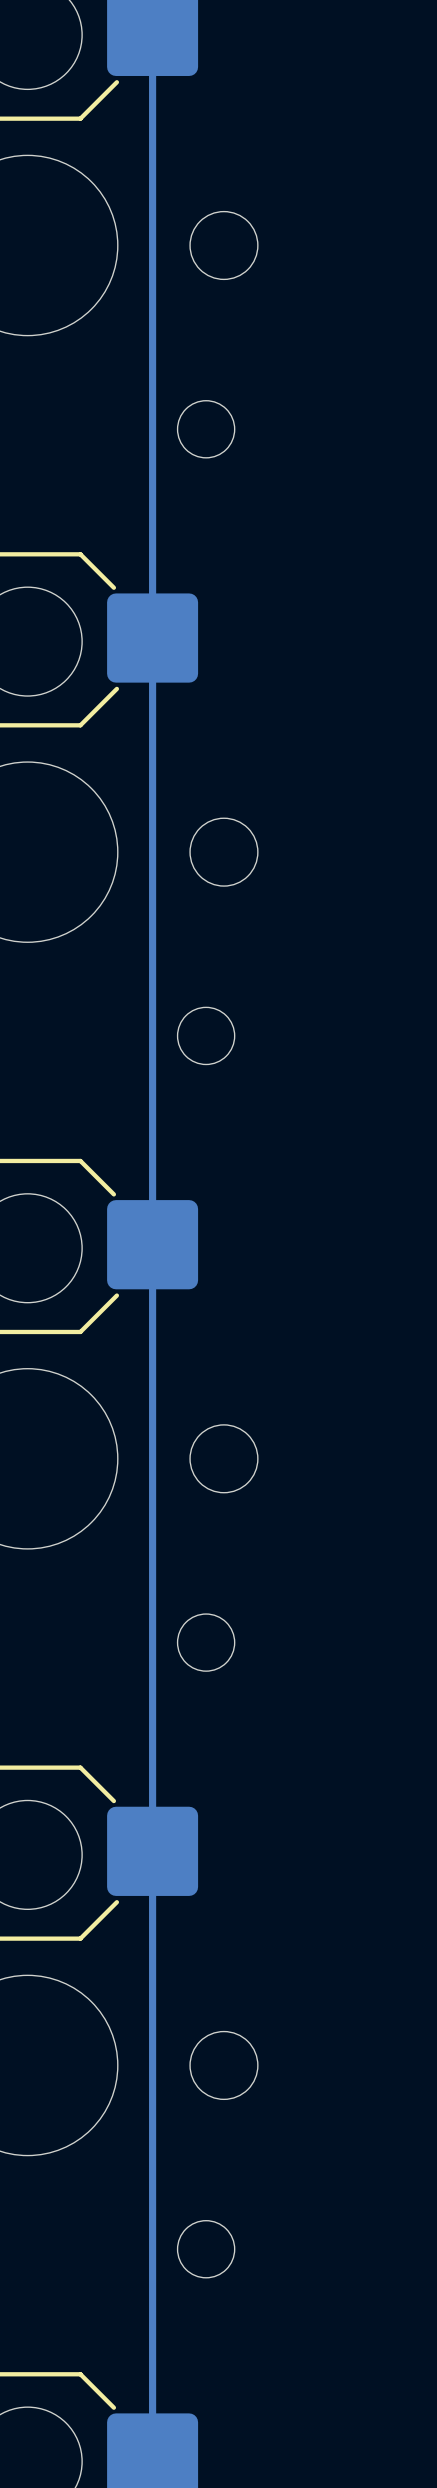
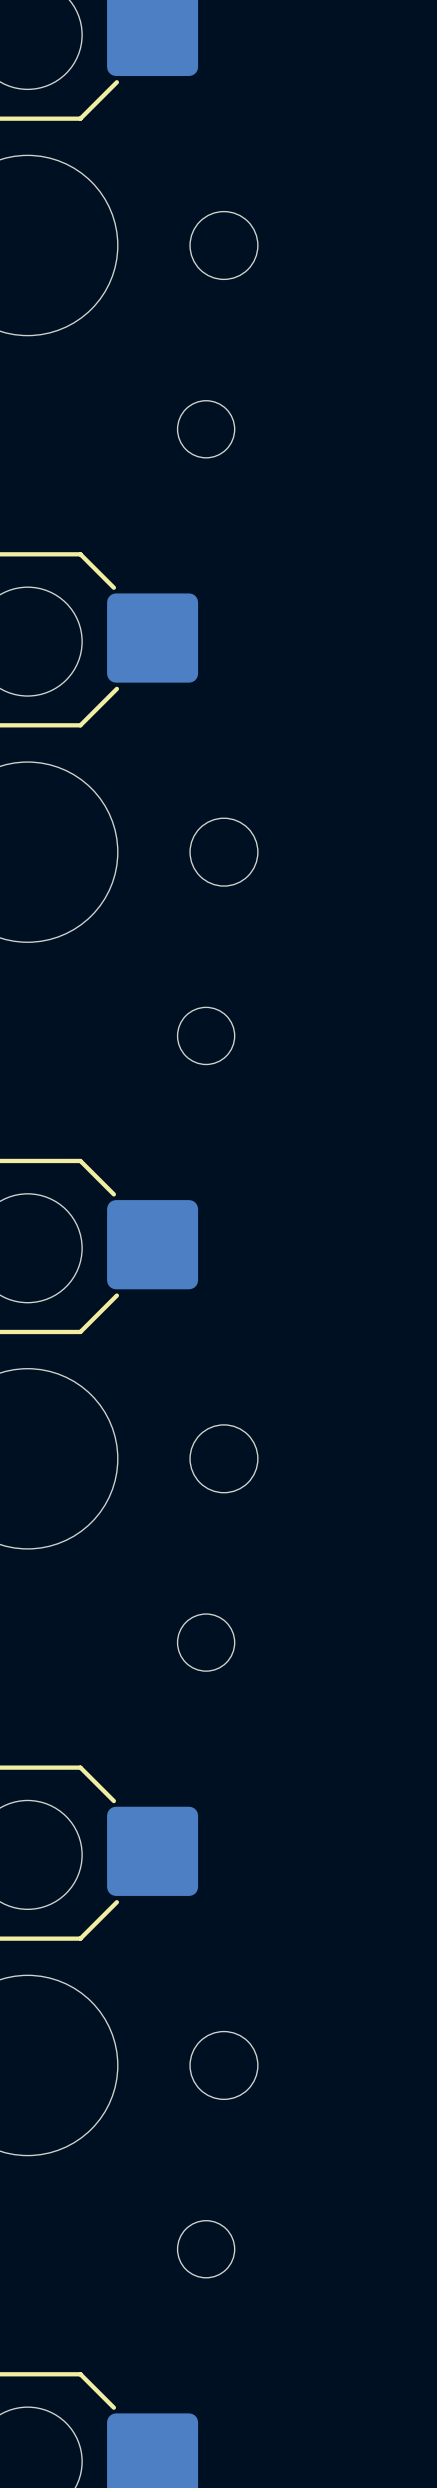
bottom track: (152, 31) (152, 2458) -> none

